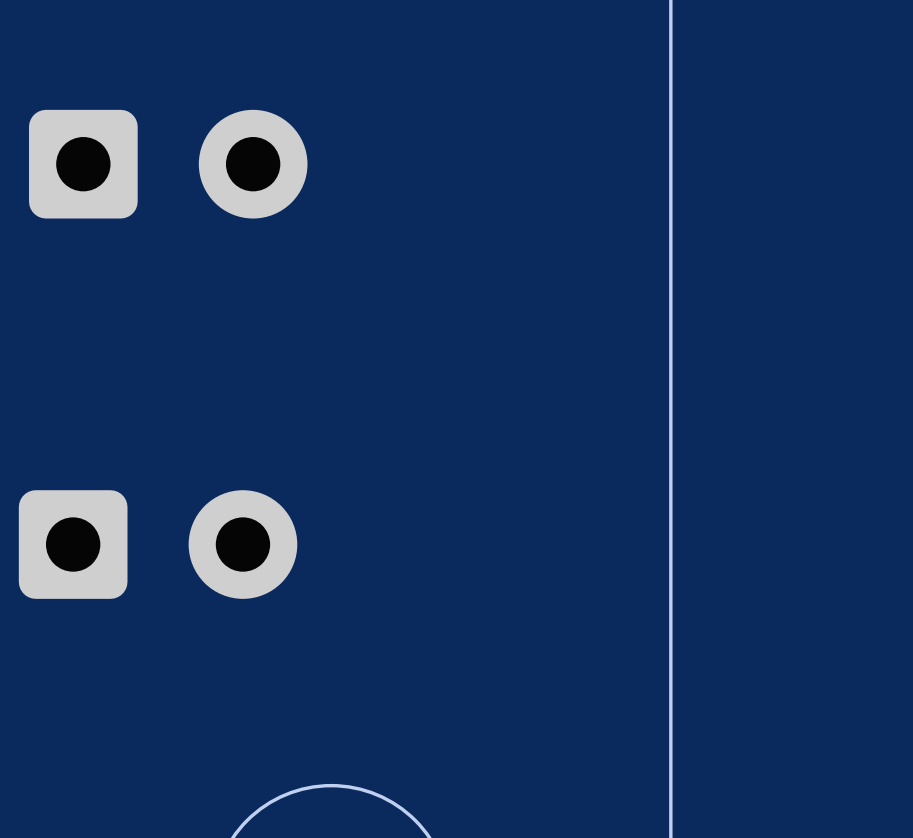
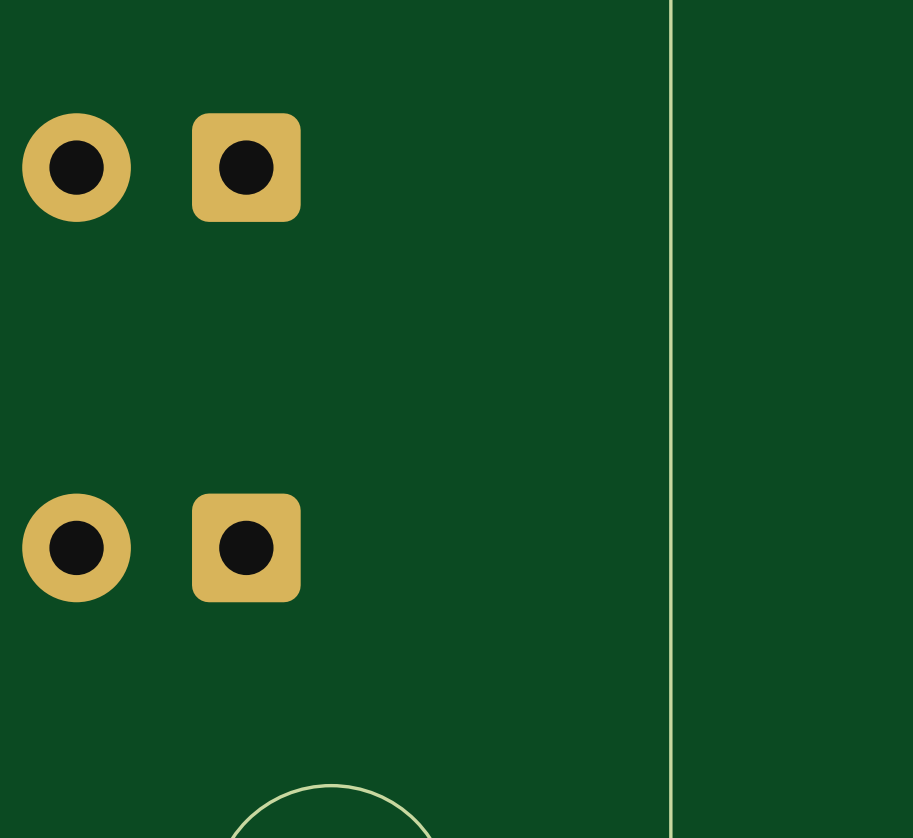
part rotation: 0° (168, 164) -> 180° (161, 167)
part rotation: 0° (158, 544) -> 180° (161, 547)

